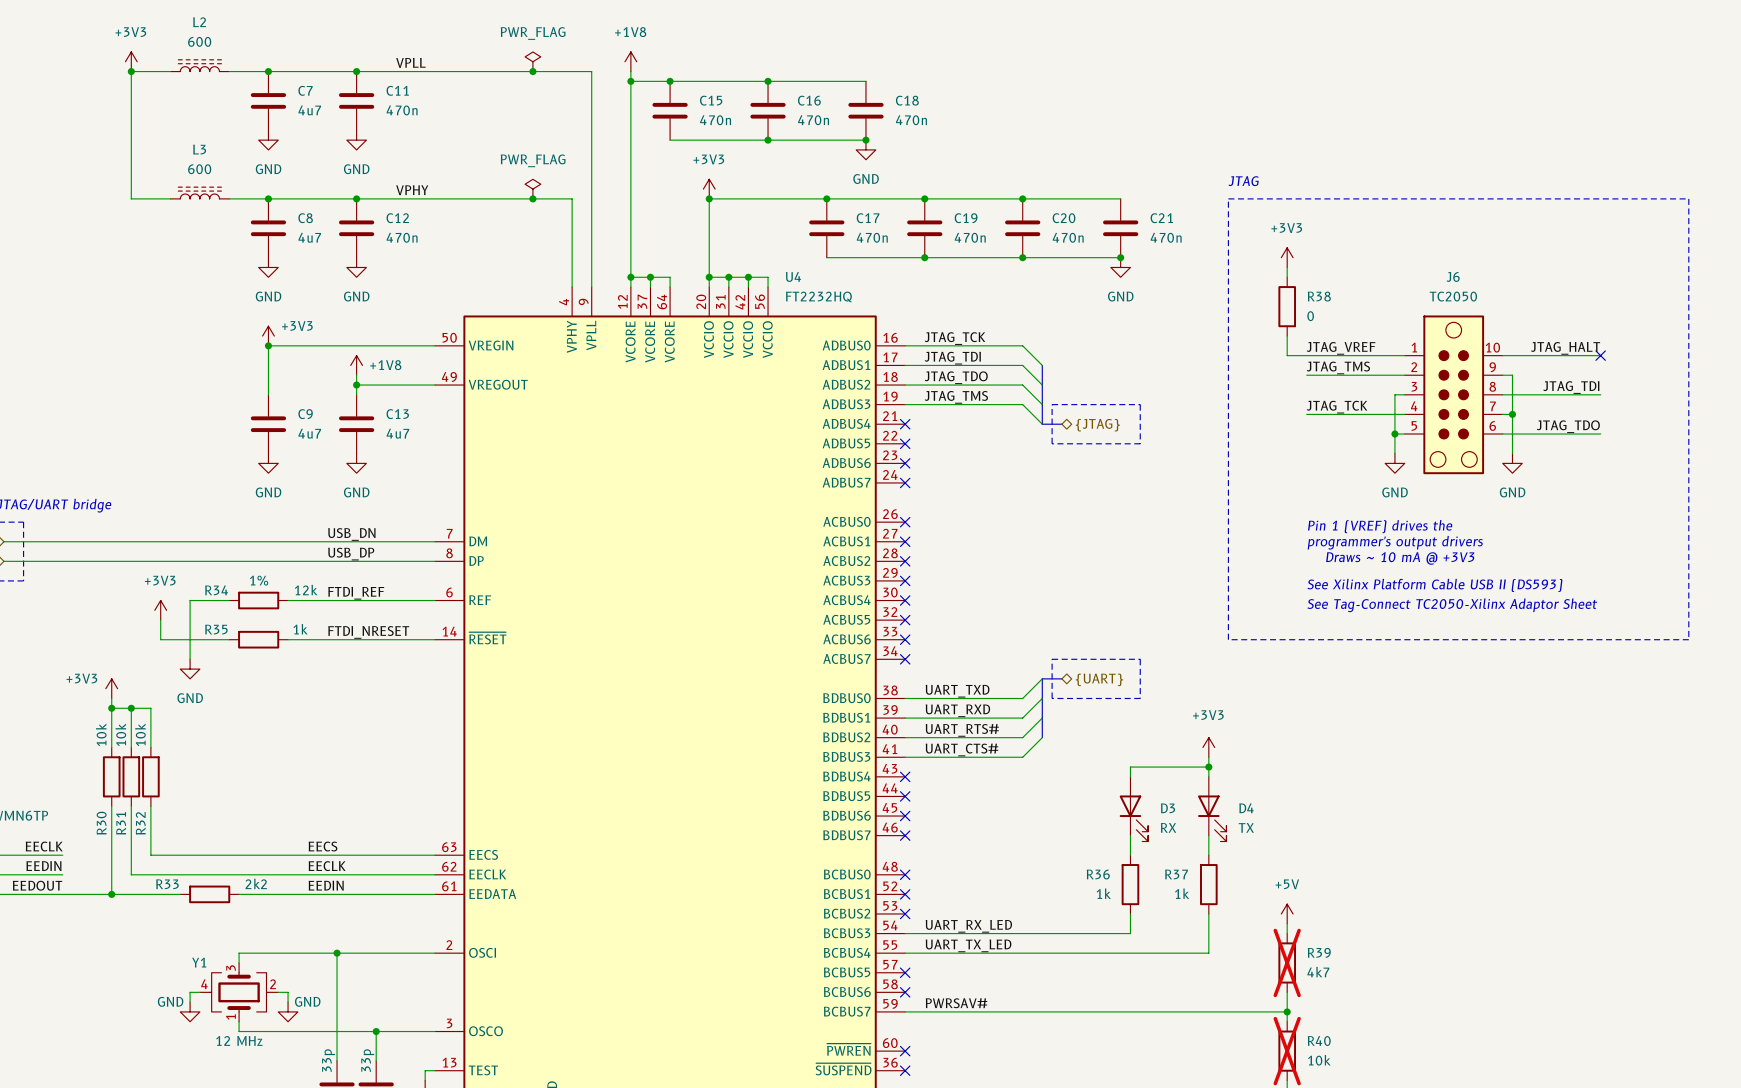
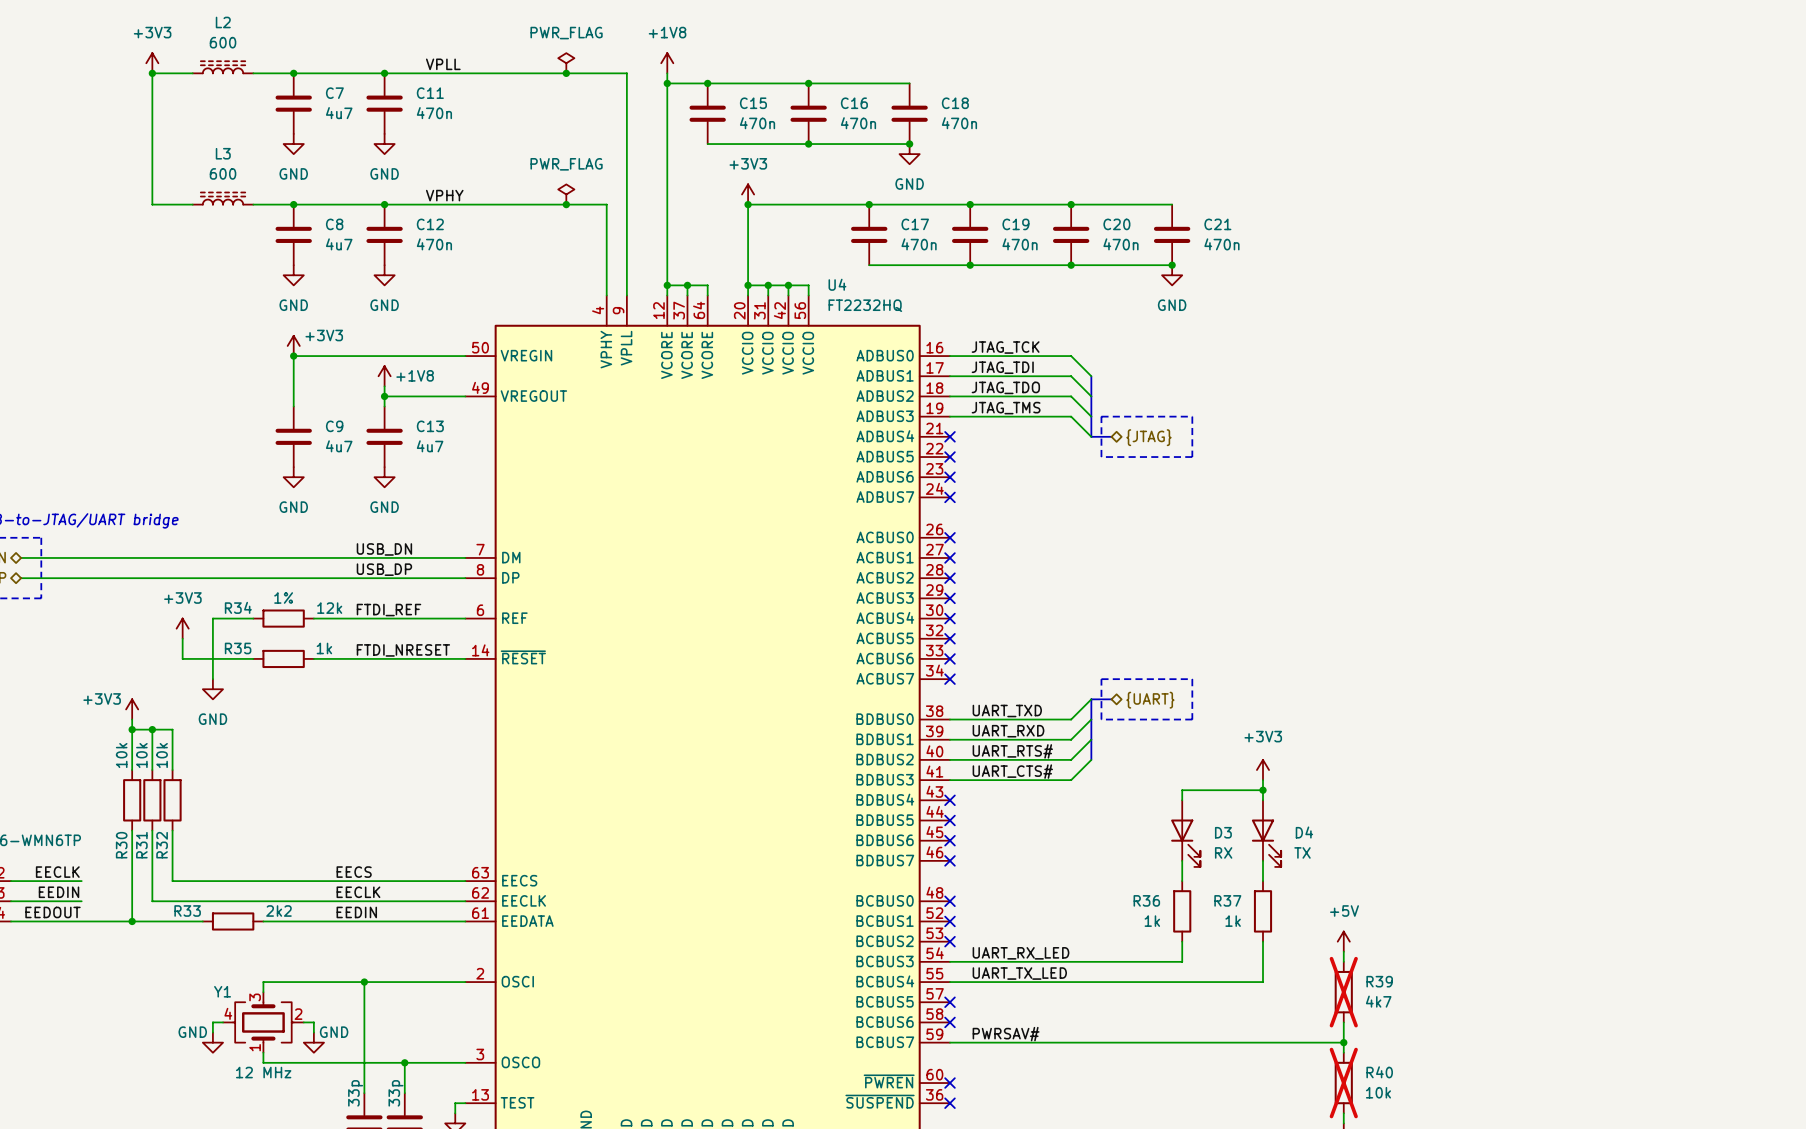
text: JTAG (1243, 181) -> none
line: (1228, 198) (1688, 198) (1688, 639) (1228, 639) (1228, 198) -> none
power symbol: +3V3 (1287, 257) -> none
wire: (1287, 267) (1287, 277) -> none
R38: 0 (1287, 306) -> none
wire: (1287, 336) (1287, 355) (1404, 355) -> none
label: JTAG_VREF (1341, 348) -> none
label: JTAG_HALT (1565, 348) -> none
wire: (1502, 355) (1600, 355) -> none
no-connect mark: (1600, 355) -> none
label: JTAG_TMS (1338, 367) -> none
wire: (1306, 375) (1404, 375) -> none
wire: (1502, 375) (1512, 375) (1512, 453) -> none
label: JTAG_TDI (1571, 387) -> none
wire: (1404, 394) (1394, 394) (1394, 453) -> none
J6: TC2050 (1453, 394) -> none
wire: (1502, 394) (1600, 394) -> none
label: JTAG_TCK (1337, 407) -> none
wire: (1306, 414) (1404, 414) -> none
wire: (1502, 414) (1512, 414) -> none
junction: (1512, 414) -> none
label: JTAG_TDO (1568, 426) -> none
wire: (1394, 434) (1404, 434) -> none
junction: (1394, 434) -> none
wire: (1502, 434) (1600, 434) -> none
power symbol: GND (1394, 463) -> none
power symbol: GND (1512, 463) -> none
text: Pin 1 (VREF) drives the (1380, 526) -> none
text: programmer's output drivers (1395, 542) -> none
text: Draws ~ 10 mA @ +3V3 (1400, 558) -> none
text: See Xilinx Platform Cable USB II (DS593) (1434, 585) -> none
text: See Tag-Connect TC2050-Xilinx Adaptor Sheet (1452, 605) -> none

